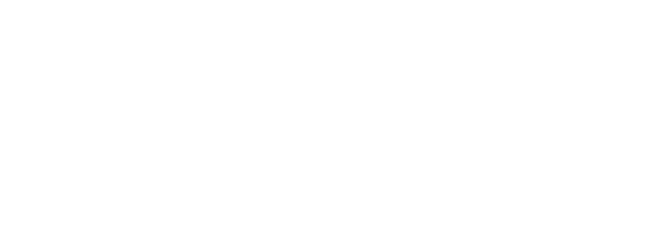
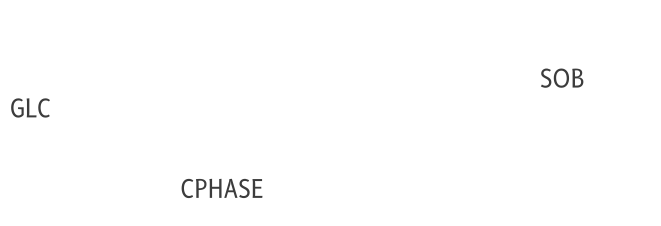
text: none -> SOB (562, 78)
text: none -> GLC (30, 107)
text: none -> CPHASE (222, 188)

